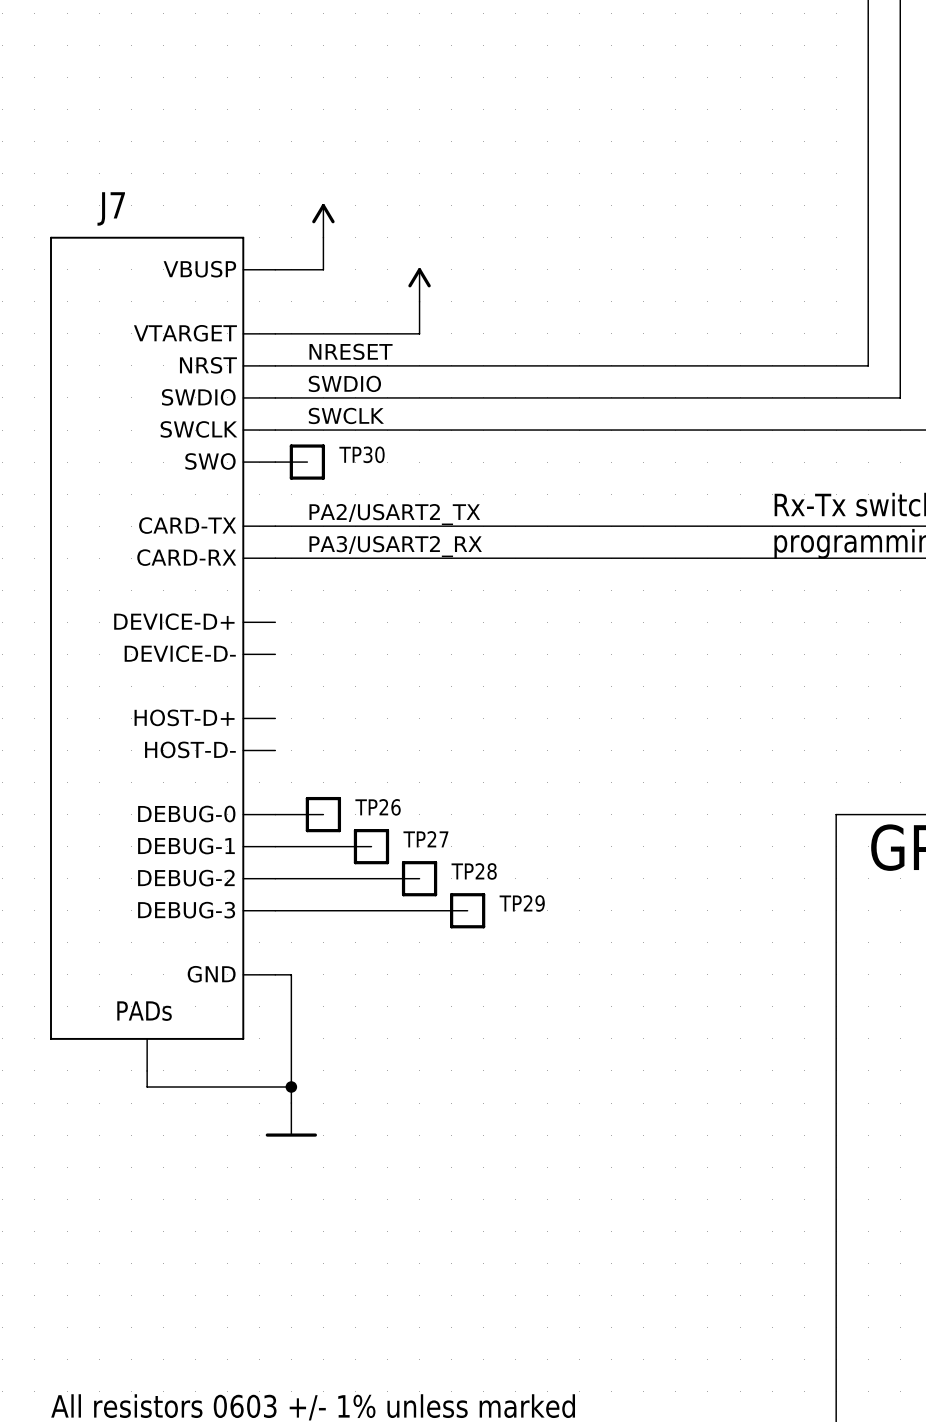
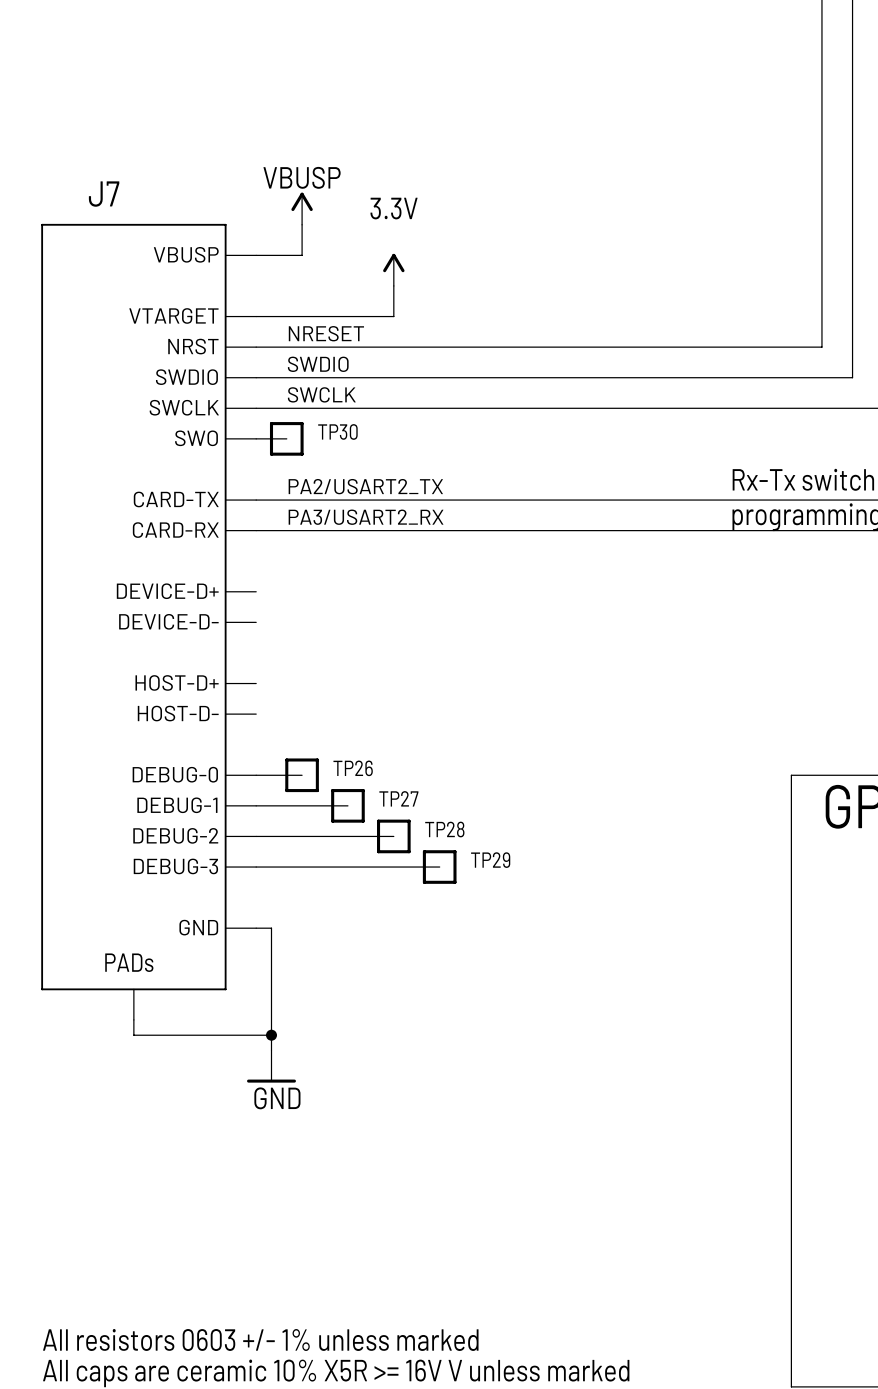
power symbol text: none -> VBUSP (302, 177)
power symbol text: none -> 3.3V (394, 208)
power symbol text: none -> GND (277, 1098)

